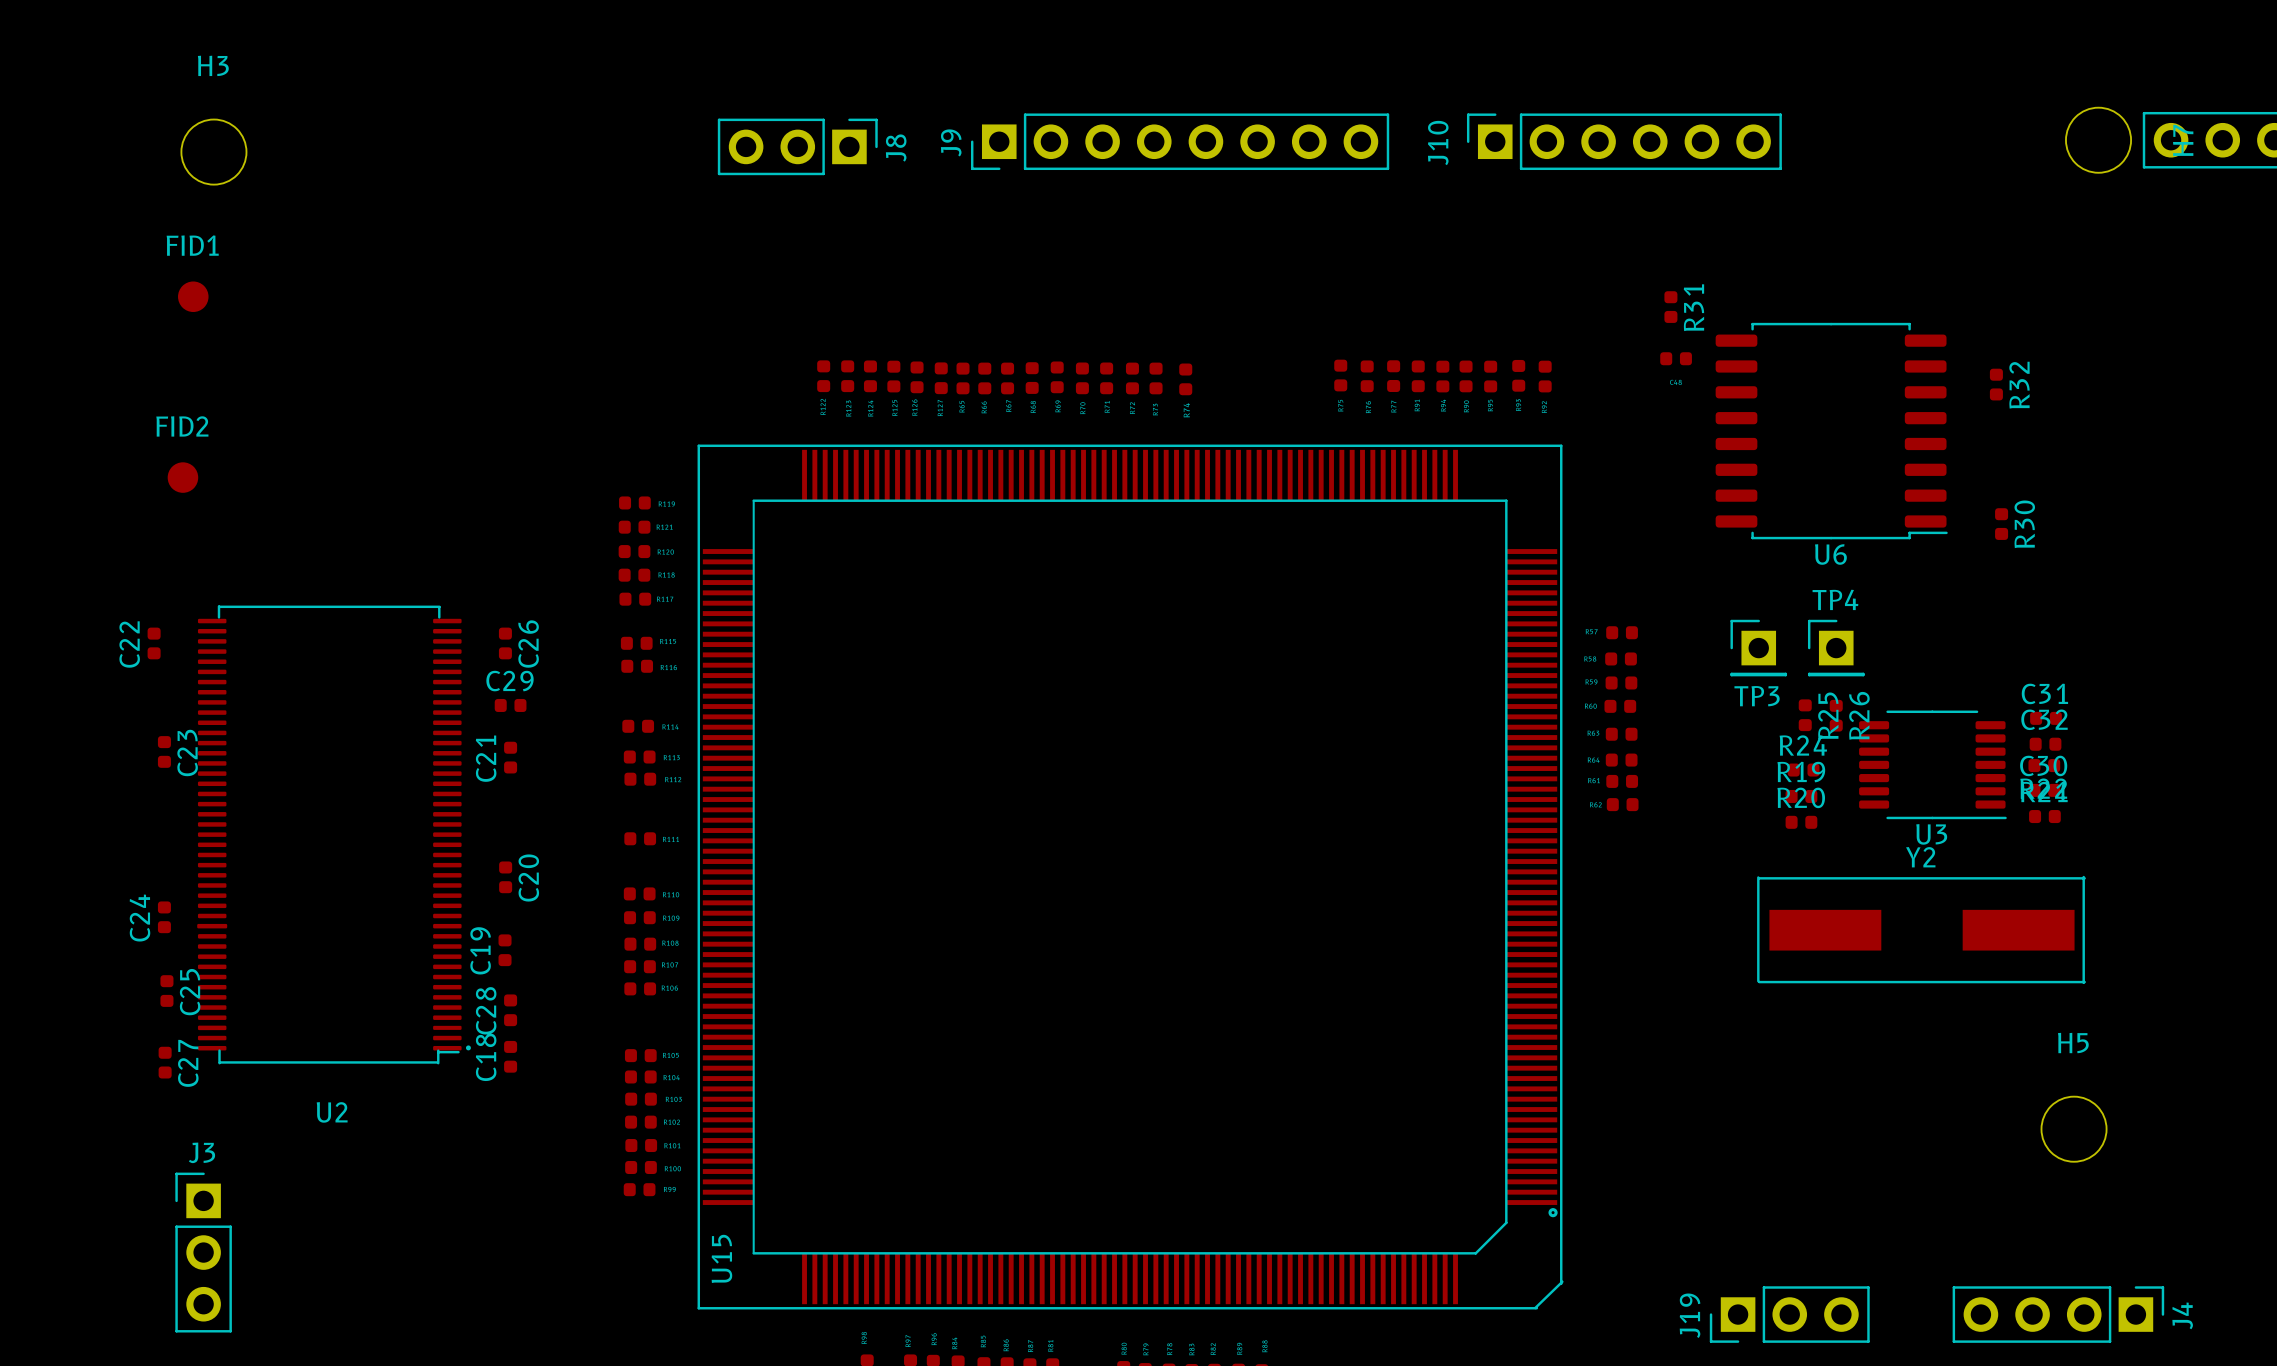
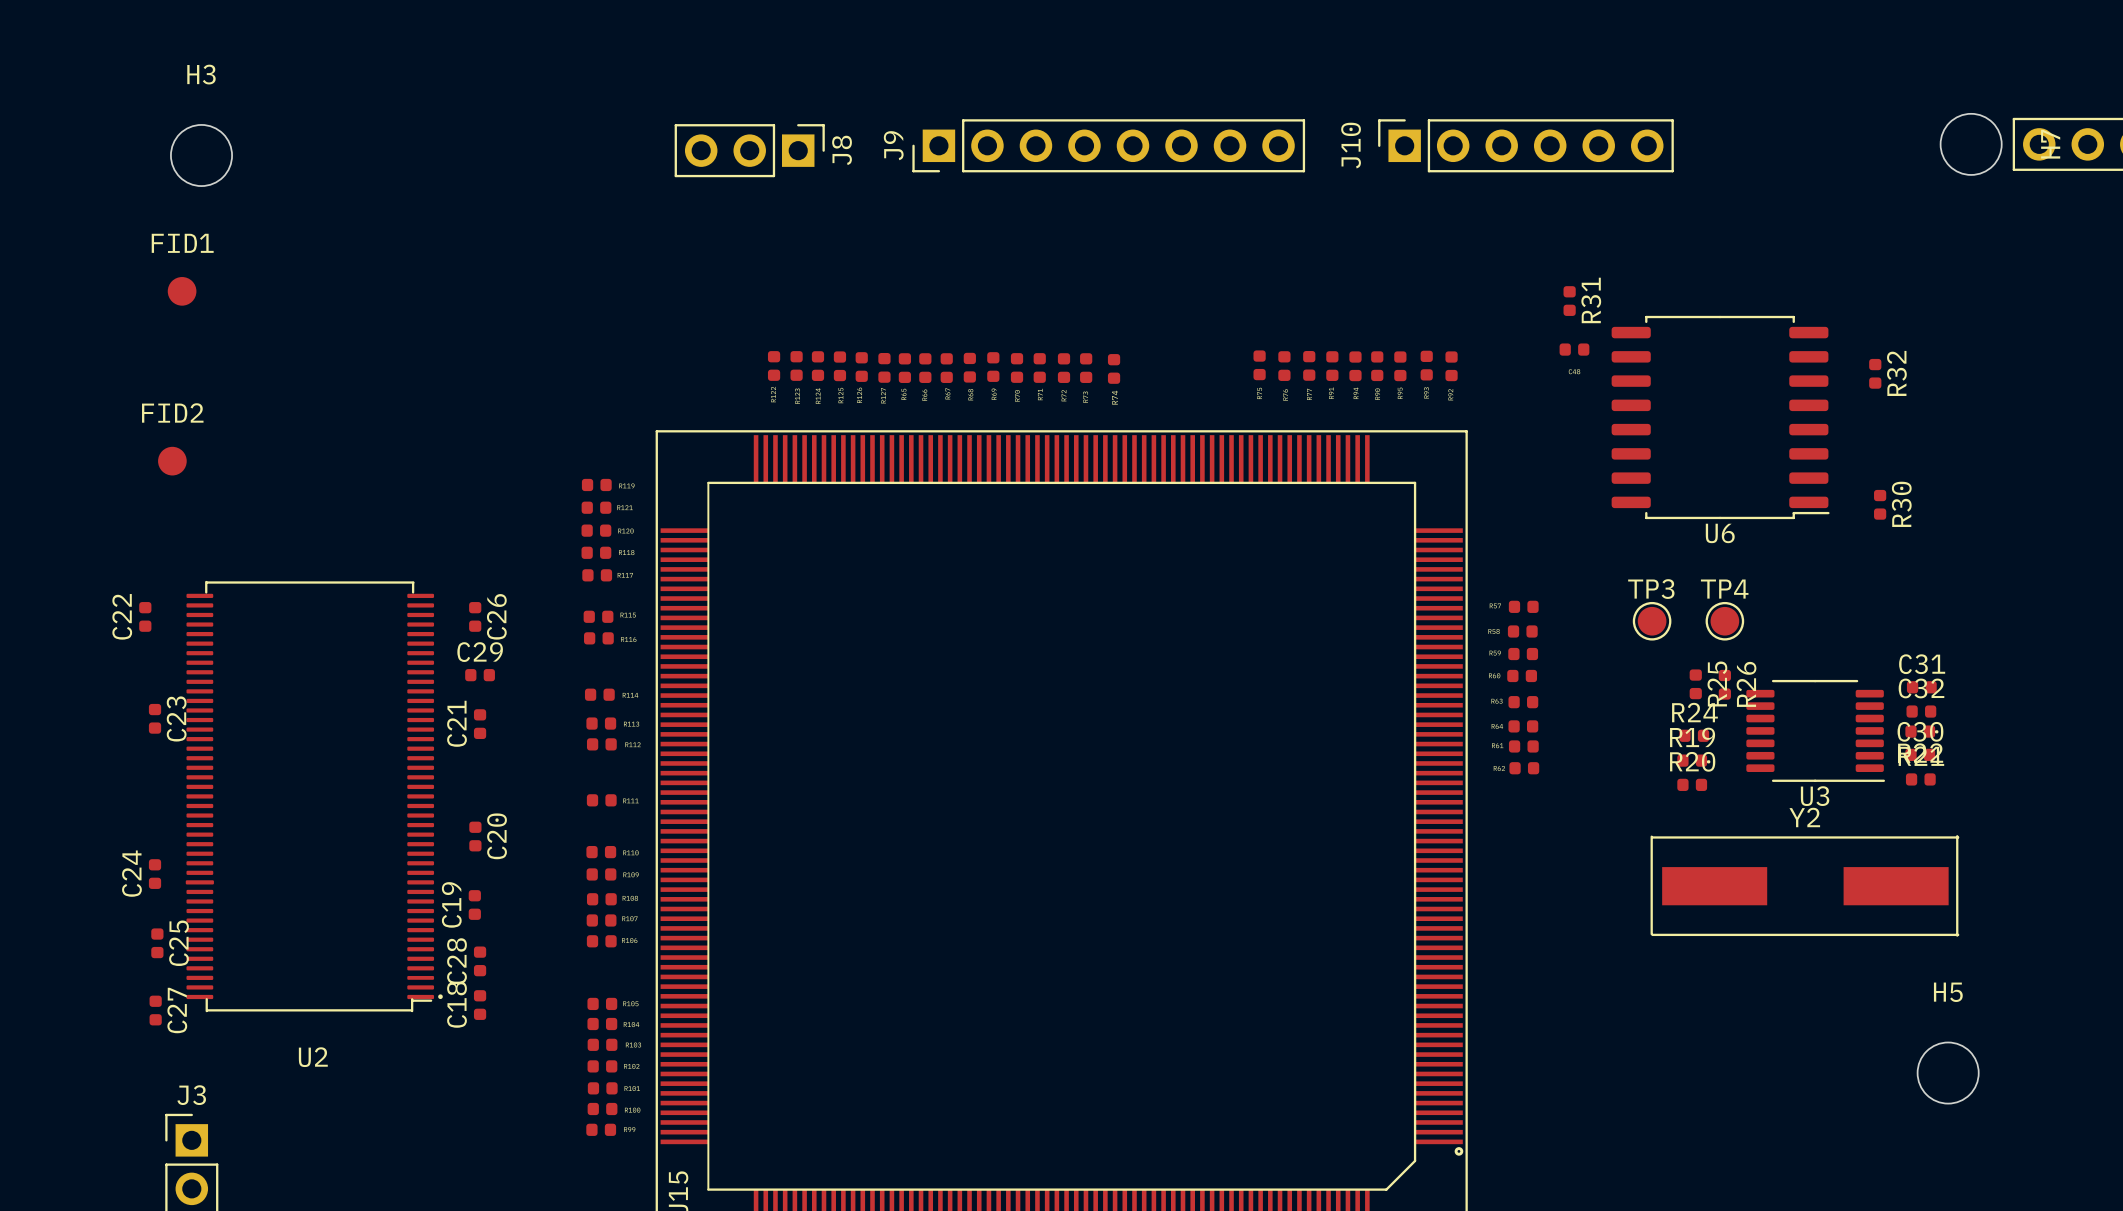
TP3 footprint: [1730, 619, 1788, 677] -> [1632, 601, 1672, 641]
TP4 footprint: [1807, 619, 1865, 677] -> [1705, 601, 1745, 641]
TP3 name position: TP3 (1757, 696) -> TP3 (1651, 589)

